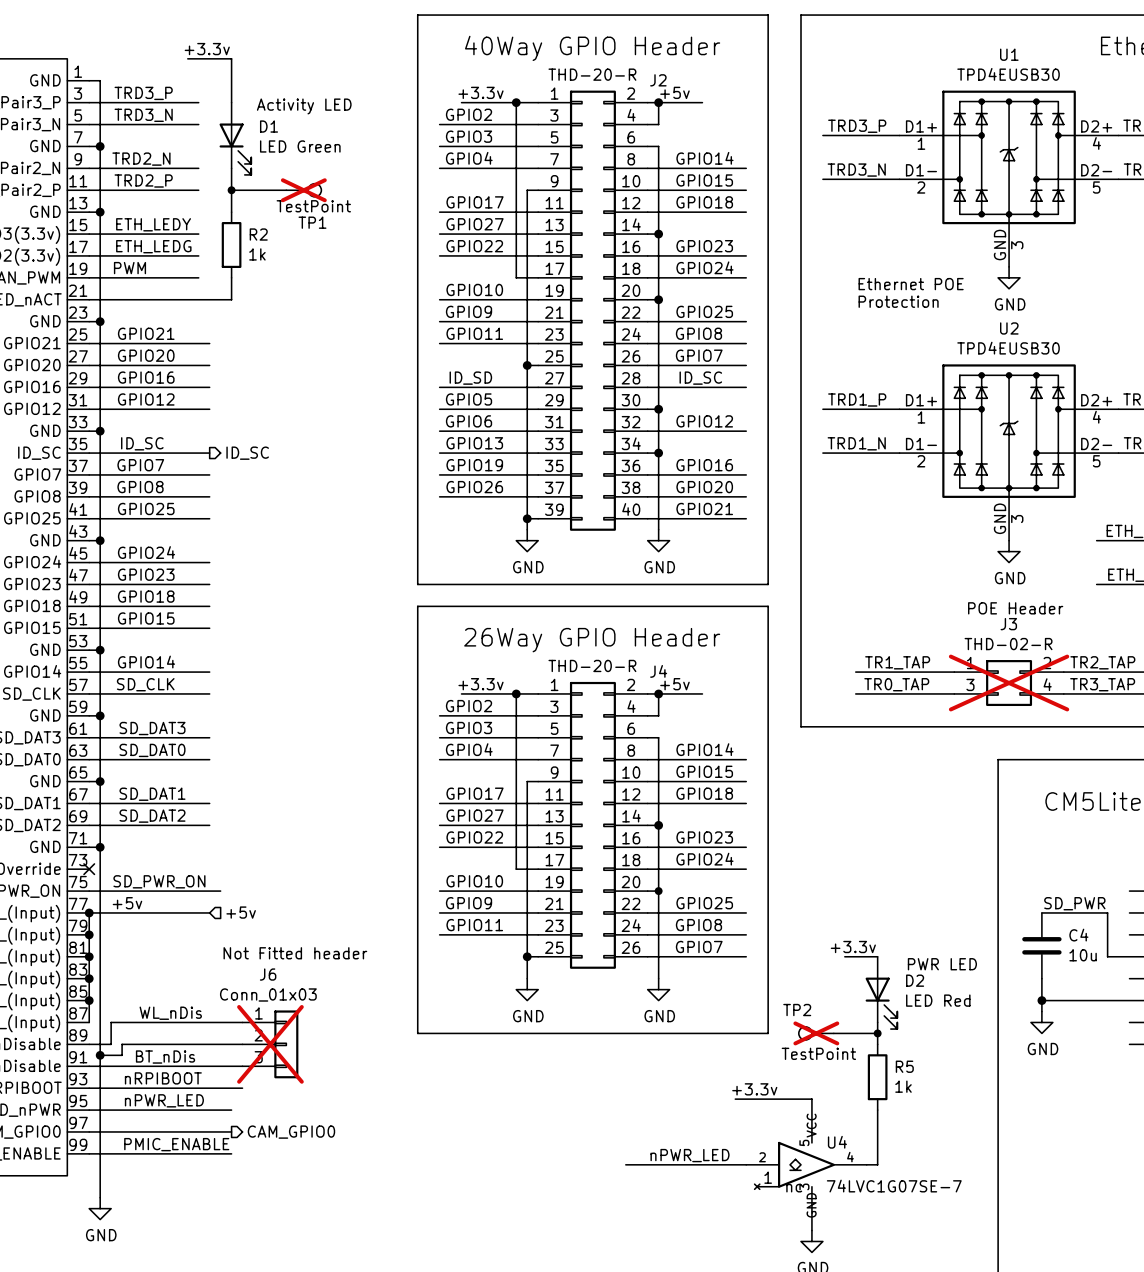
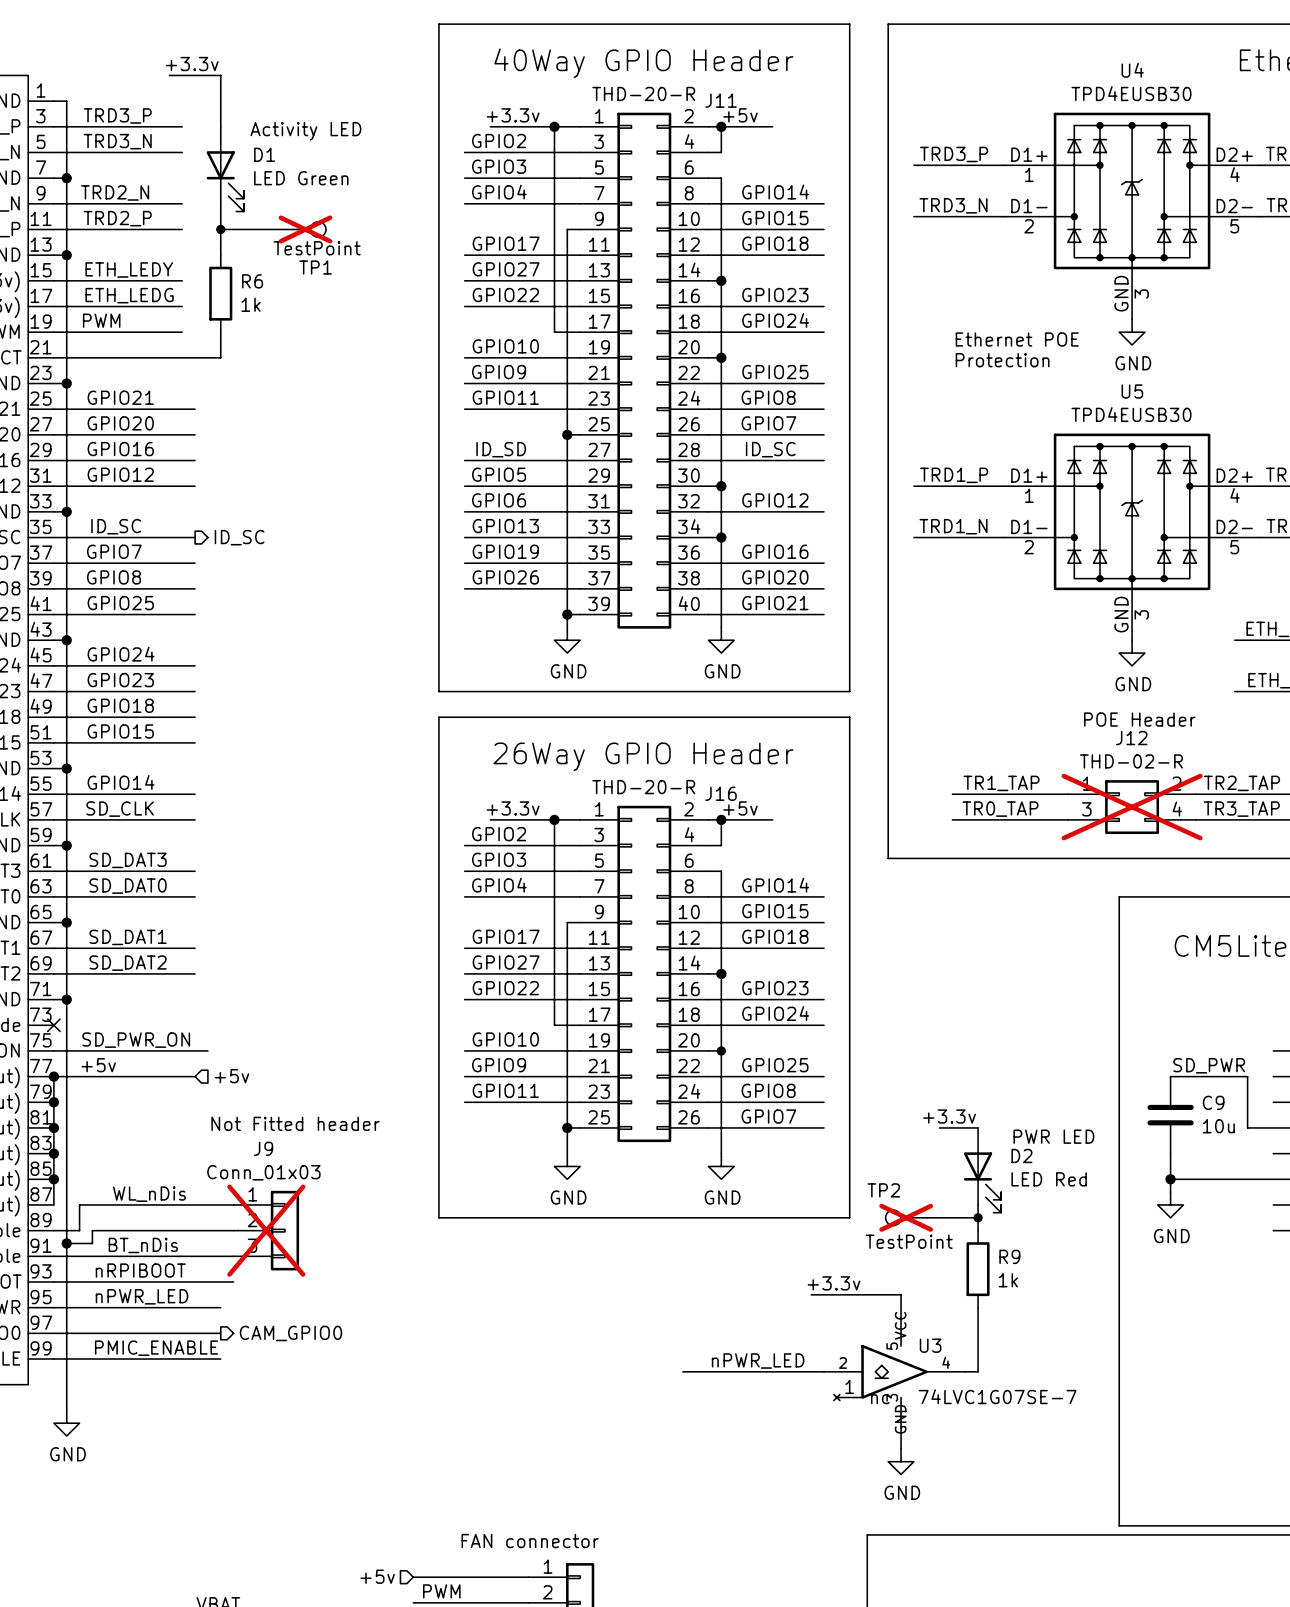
U1 name: U1 (1009, 54) -> U4 (1132, 70)
J2 name: J2 (658, 80) -> J11 (721, 100)
R2 name: R2 (258, 234) -> R6 (252, 281)
U2 name: U2 (1009, 328) -> U5 (1132, 391)
J3 name: J3 (1008, 624) -> J12 (1131, 738)
J4 name: J4 (658, 671) -> J16 (721, 793)
C4 name: C4 (1078, 935) -> C9 (1213, 1102)
J6 name: J6 (268, 974) -> J9 (263, 1148)
R5 name: R5 (904, 1066) -> R9 (1009, 1256)
U4 name: U4 (837, 1142) -> U3 (930, 1345)

